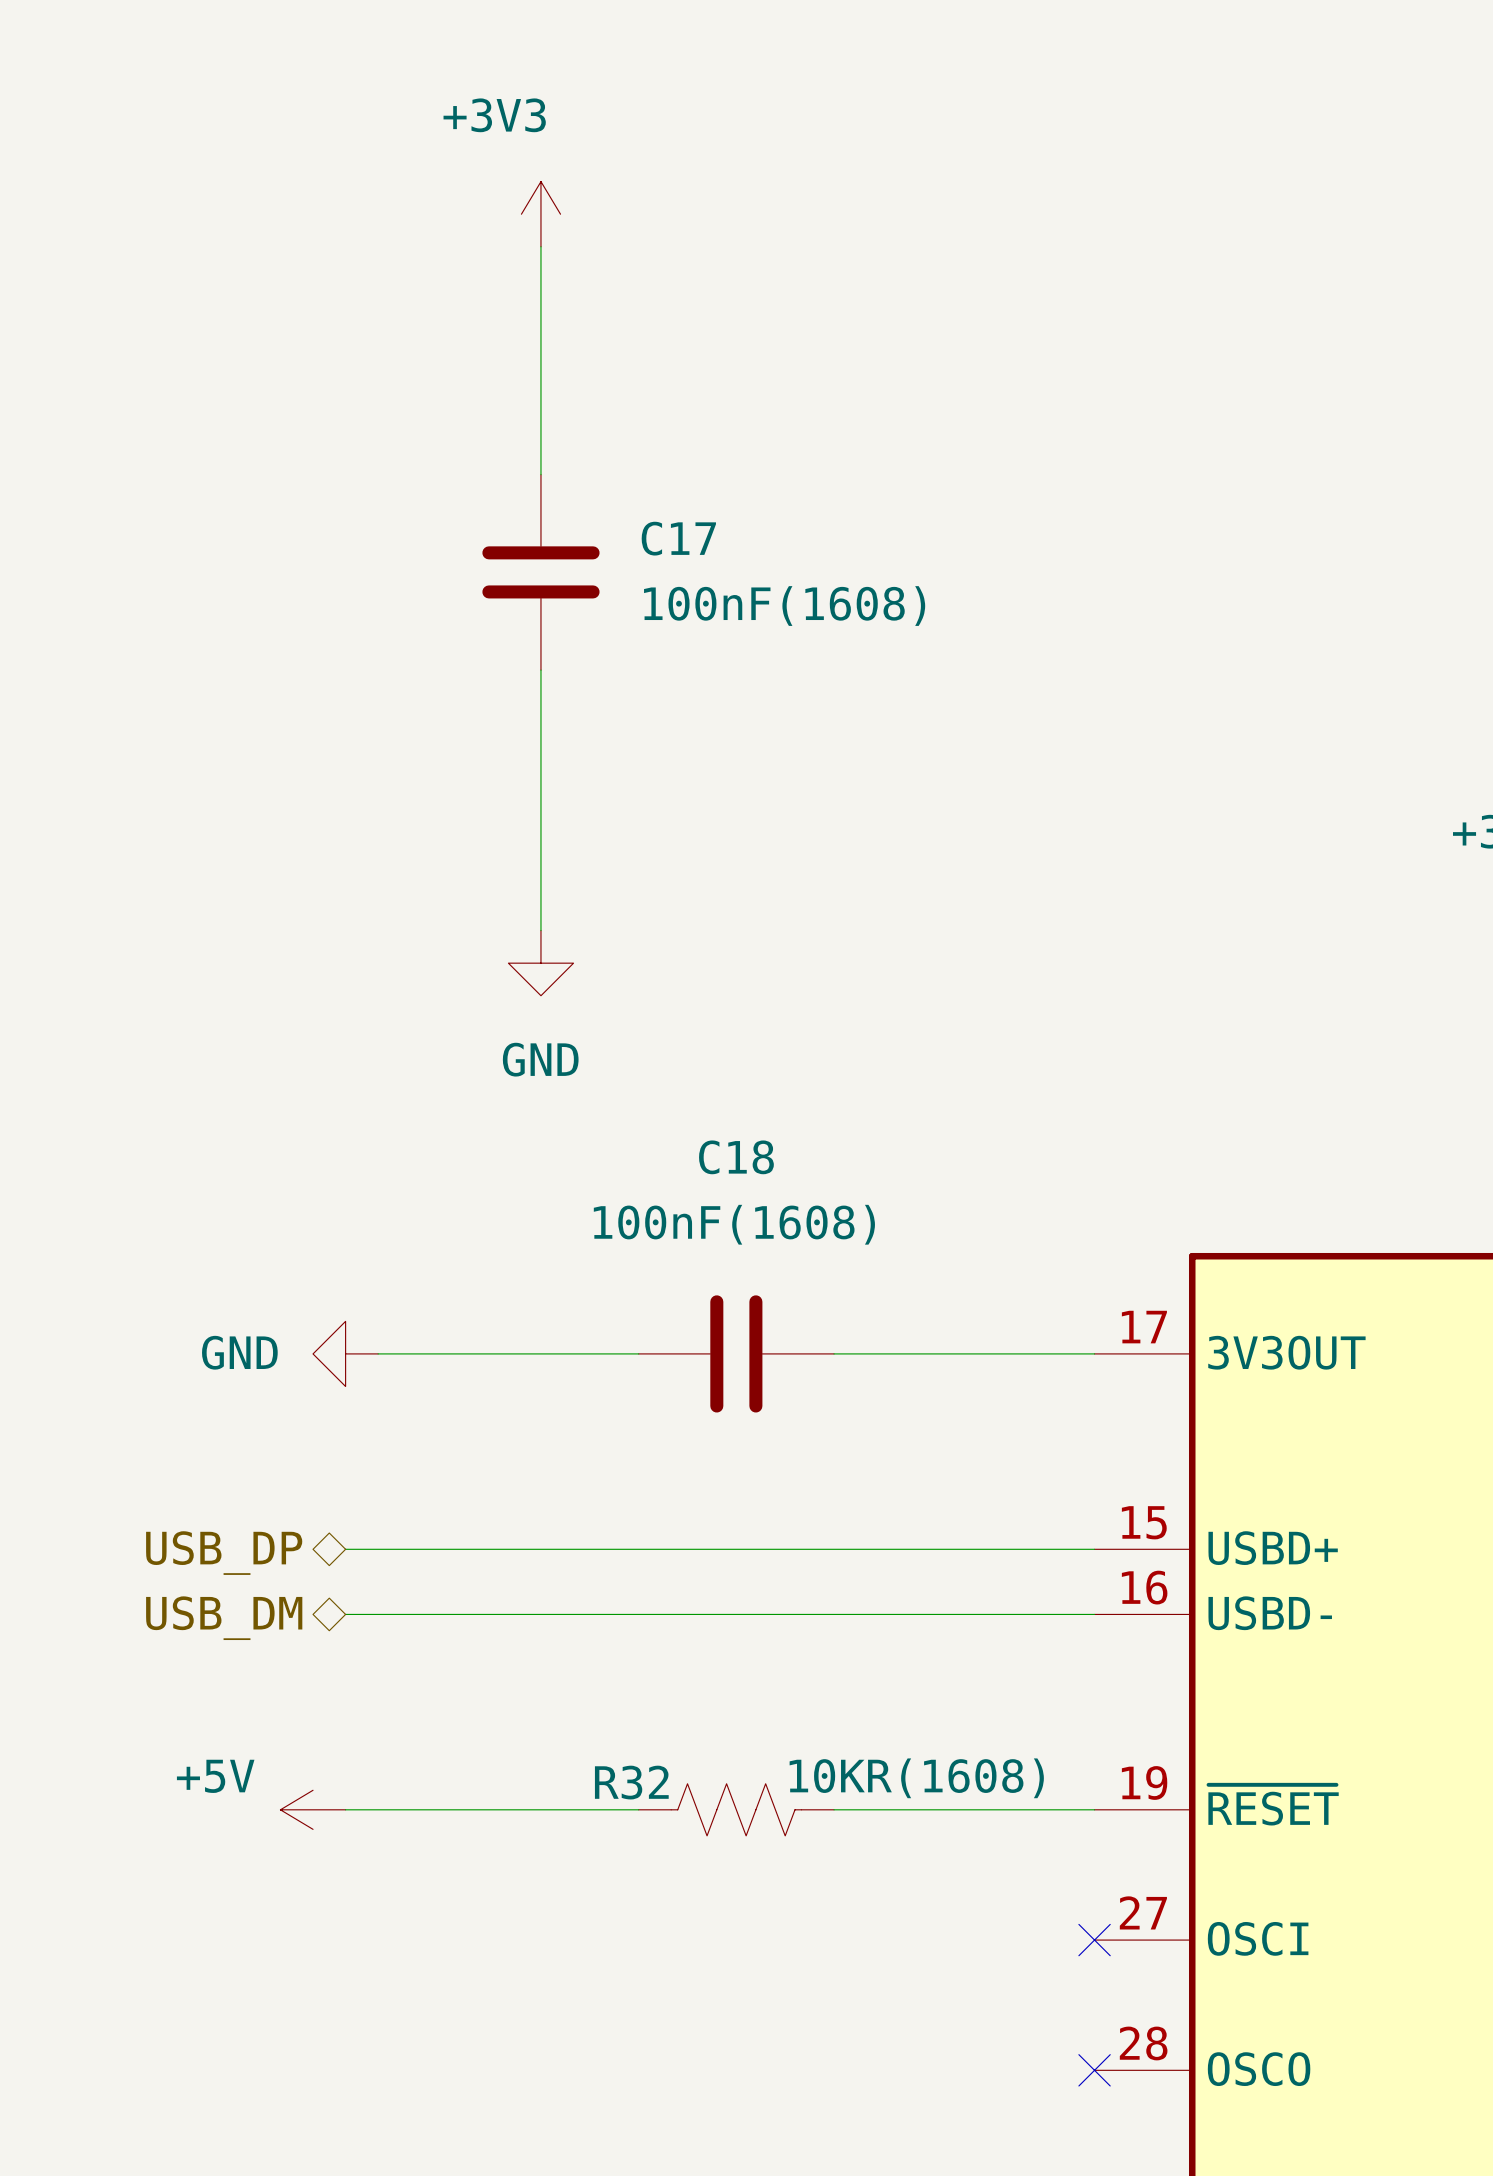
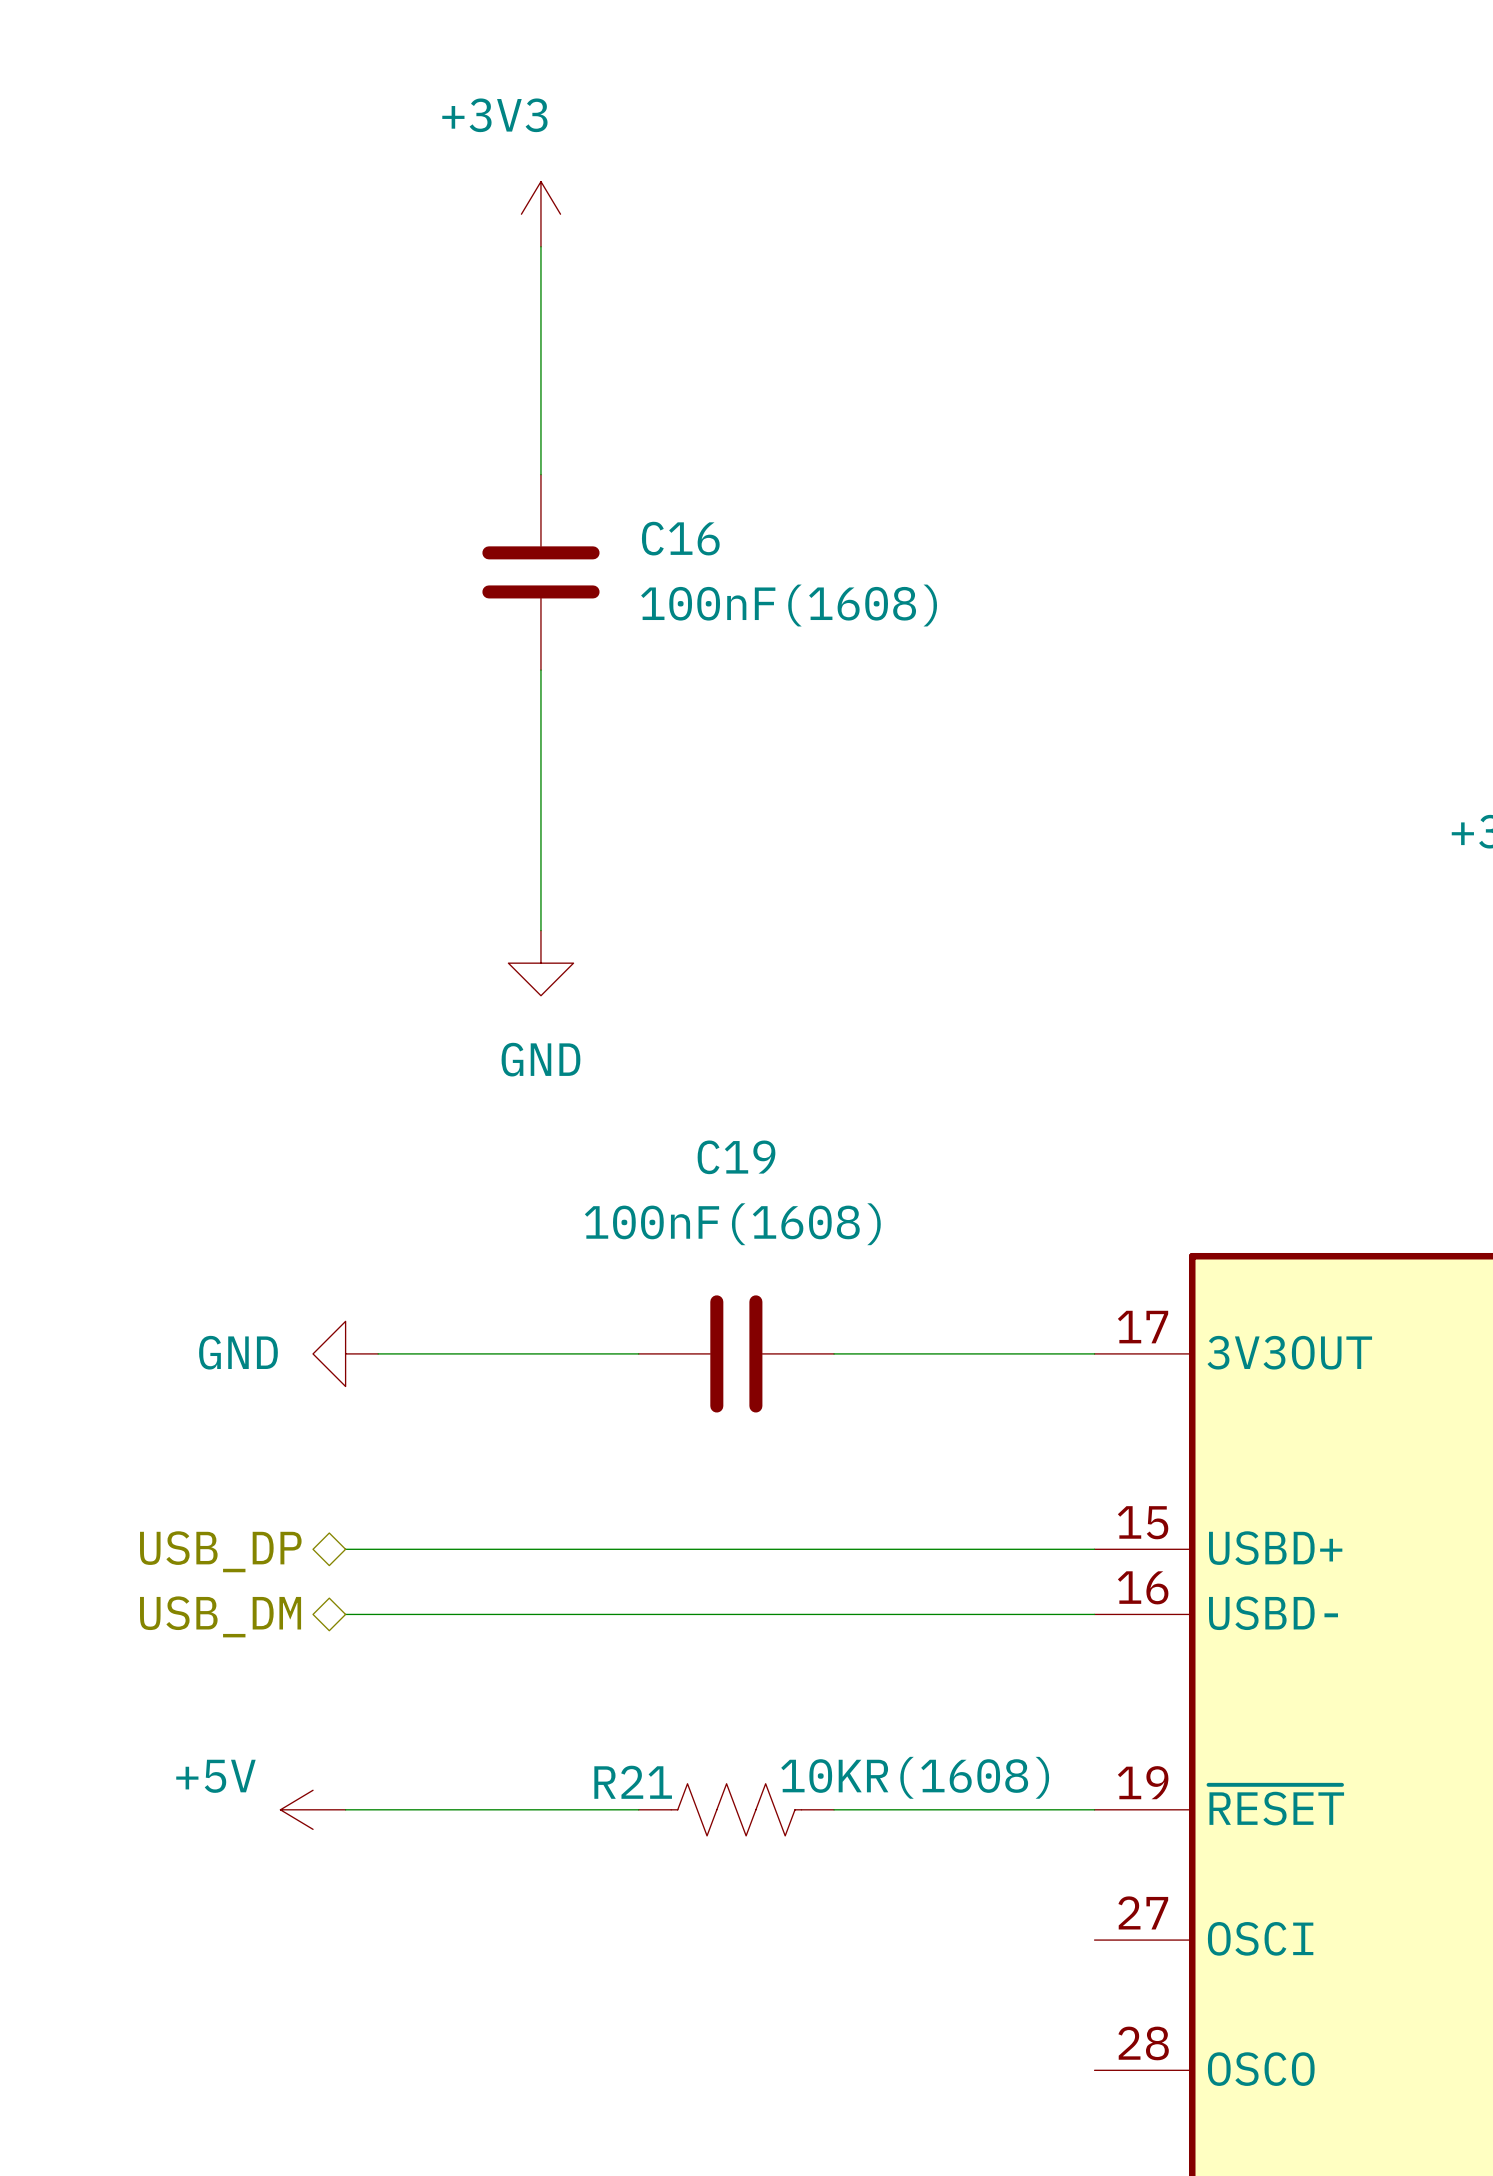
C17 name: C17 (678, 538) -> C16 (680, 538)
C18 name: C18 (736, 1157) -> C19 (736, 1157)
R32 name: R32 (631, 1782) -> R21 (633, 1782)
no-connect mark: (1094, 1940) -> none
no-connect mark: (1094, 2070) -> none

